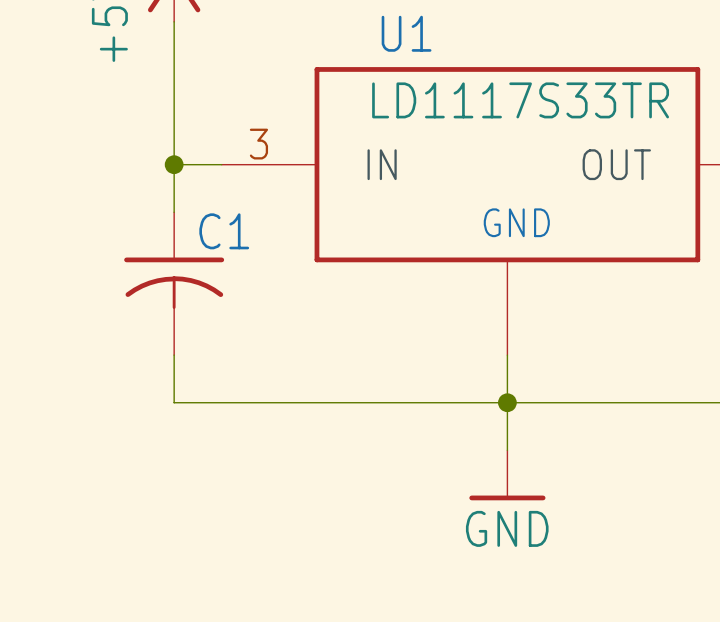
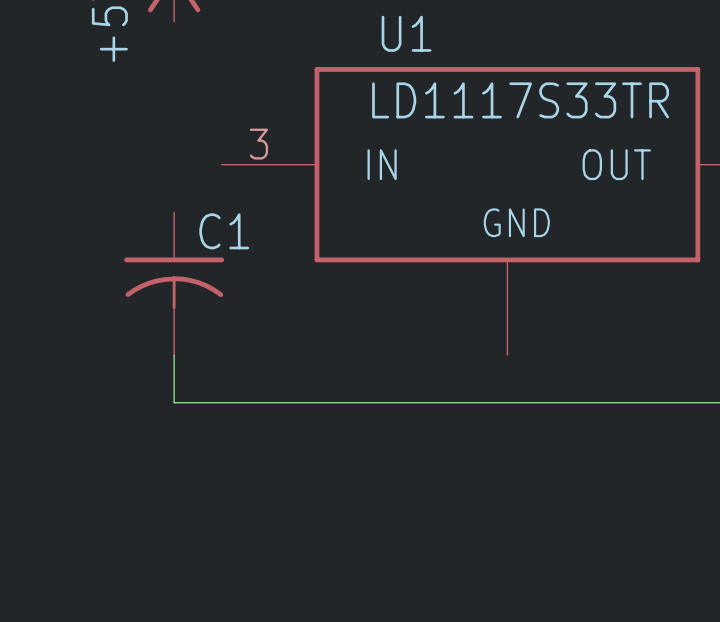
wire: (174, 21) (174, 212) -> none
wire: (174, 164) (221, 164) -> none
junction: (174, 164) -> none
wire: (507, 355) (507, 450) -> none
junction: (507, 402) -> none
power symbol: GND (507, 475) -> none

